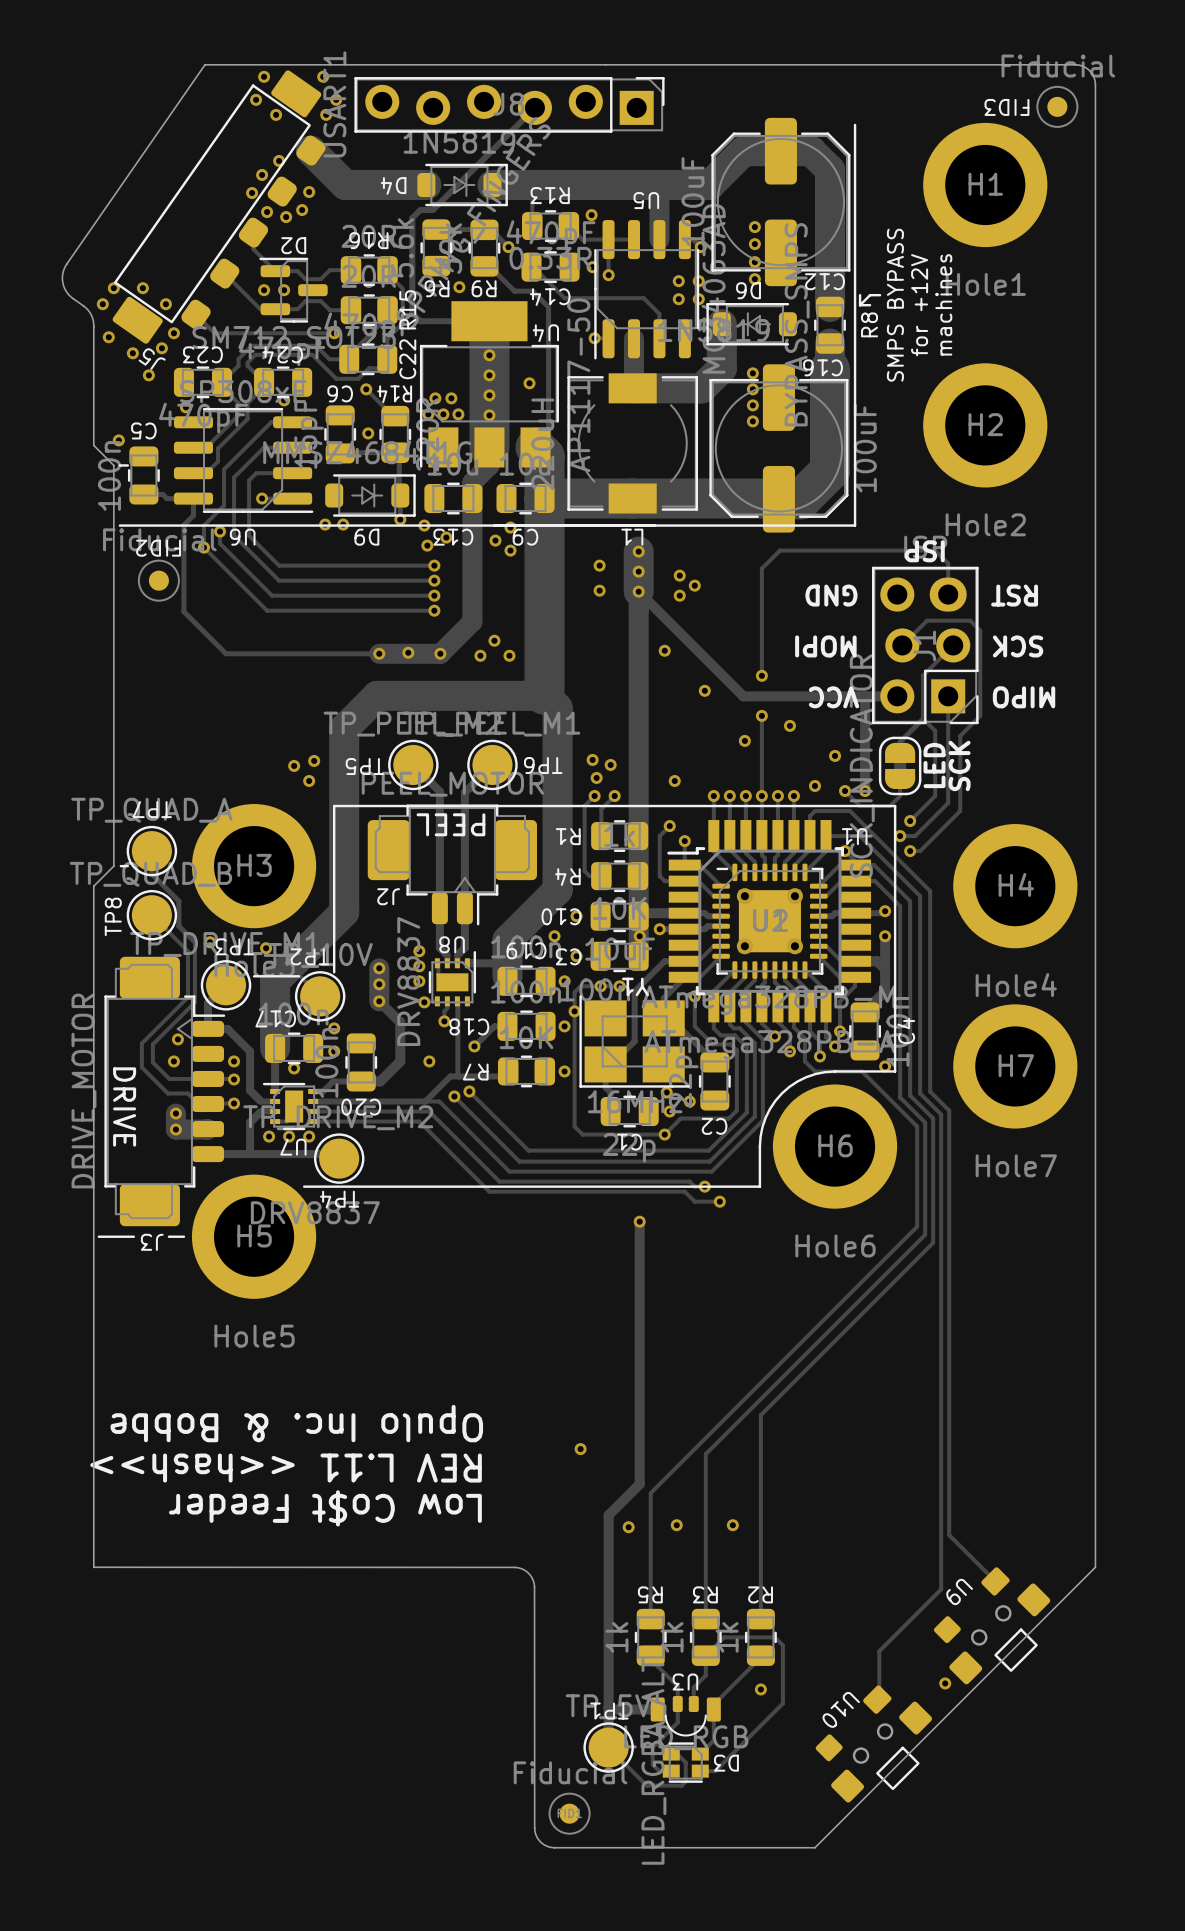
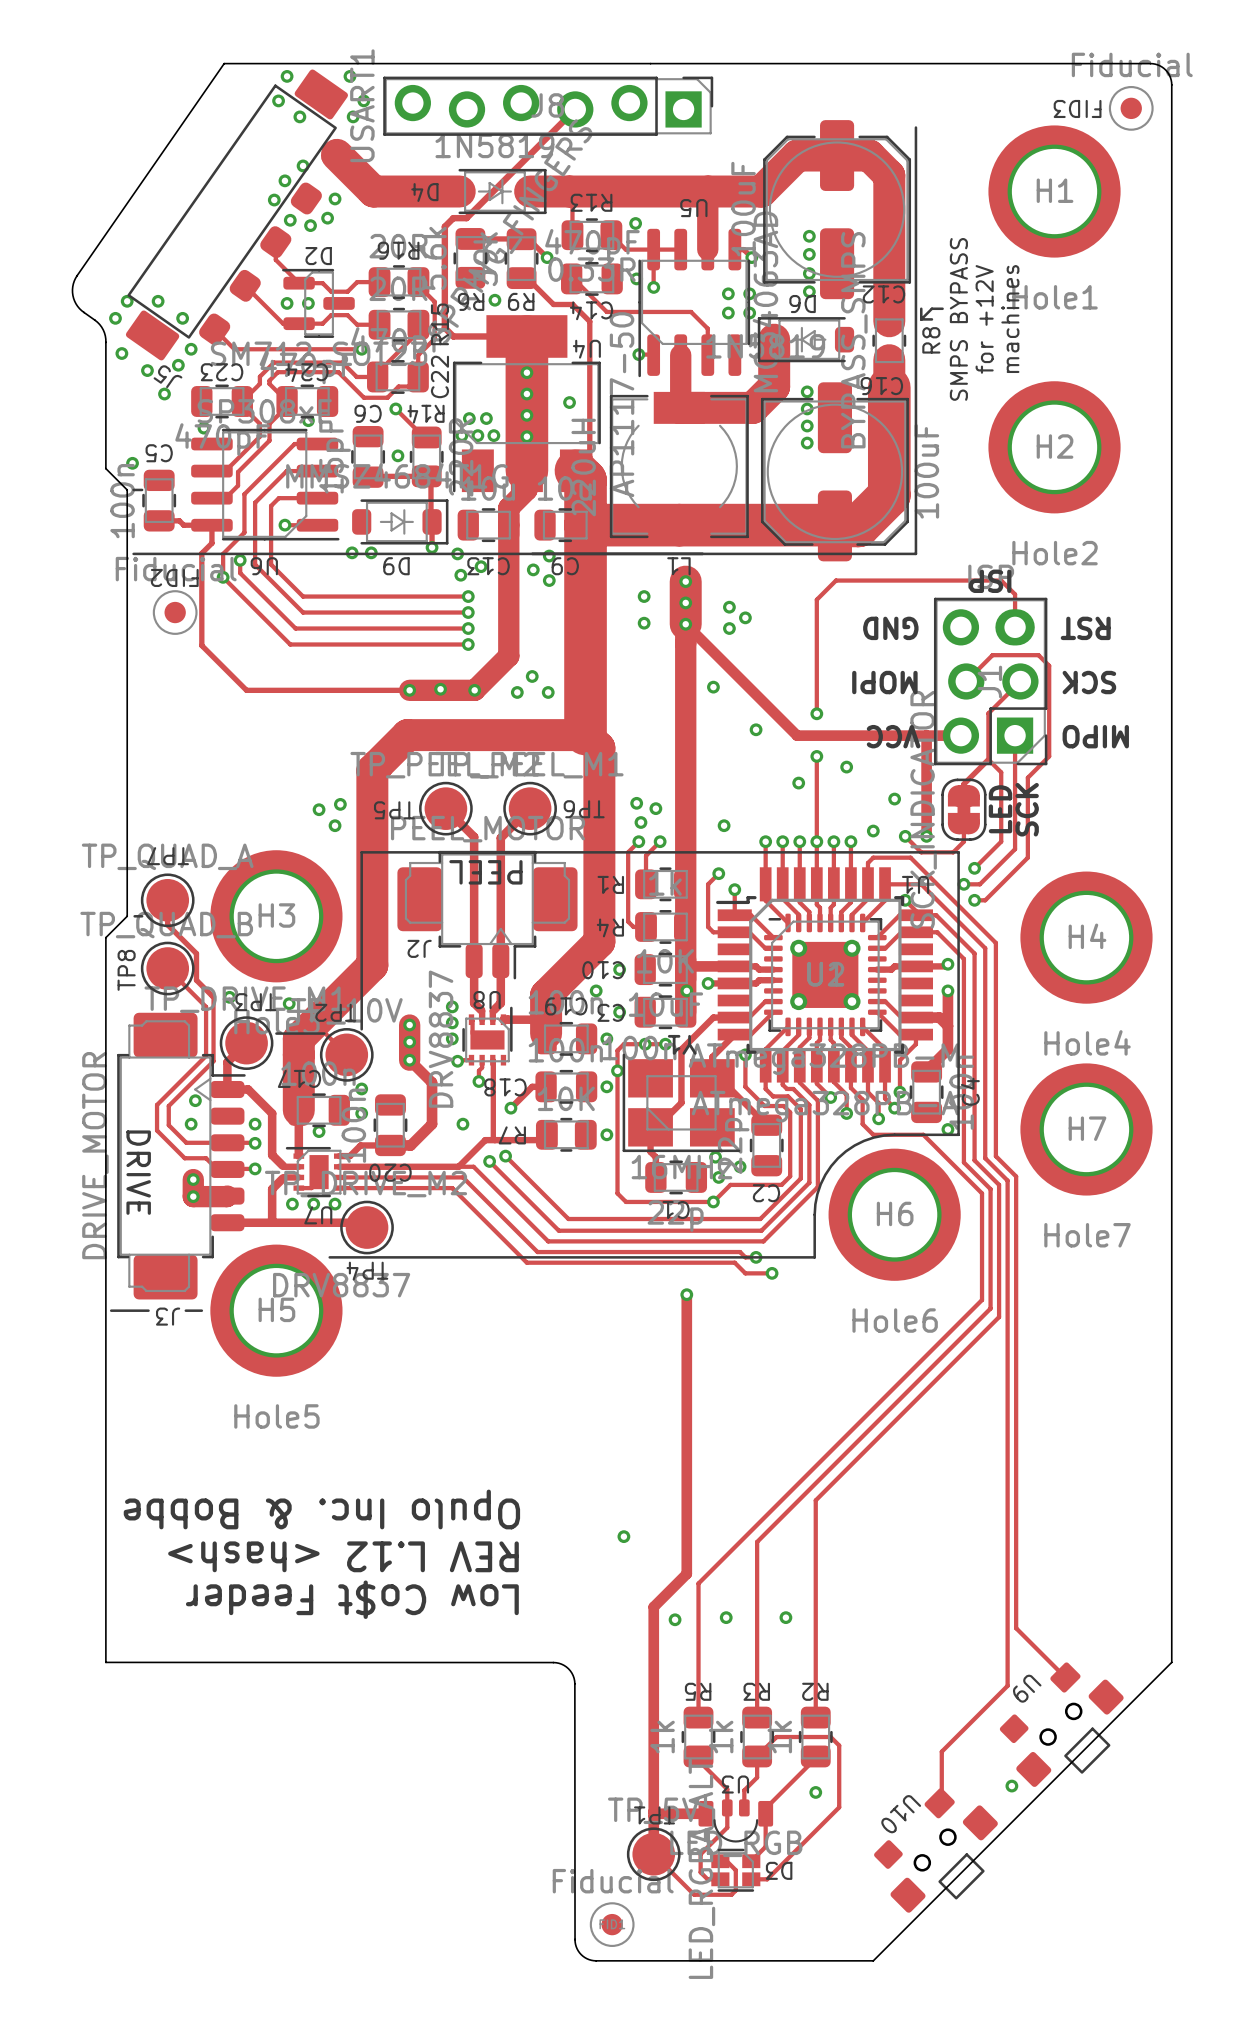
text: REV L.11 <<hash>> (286, 1468) -> REV L.12 <hash> (343, 1556)

